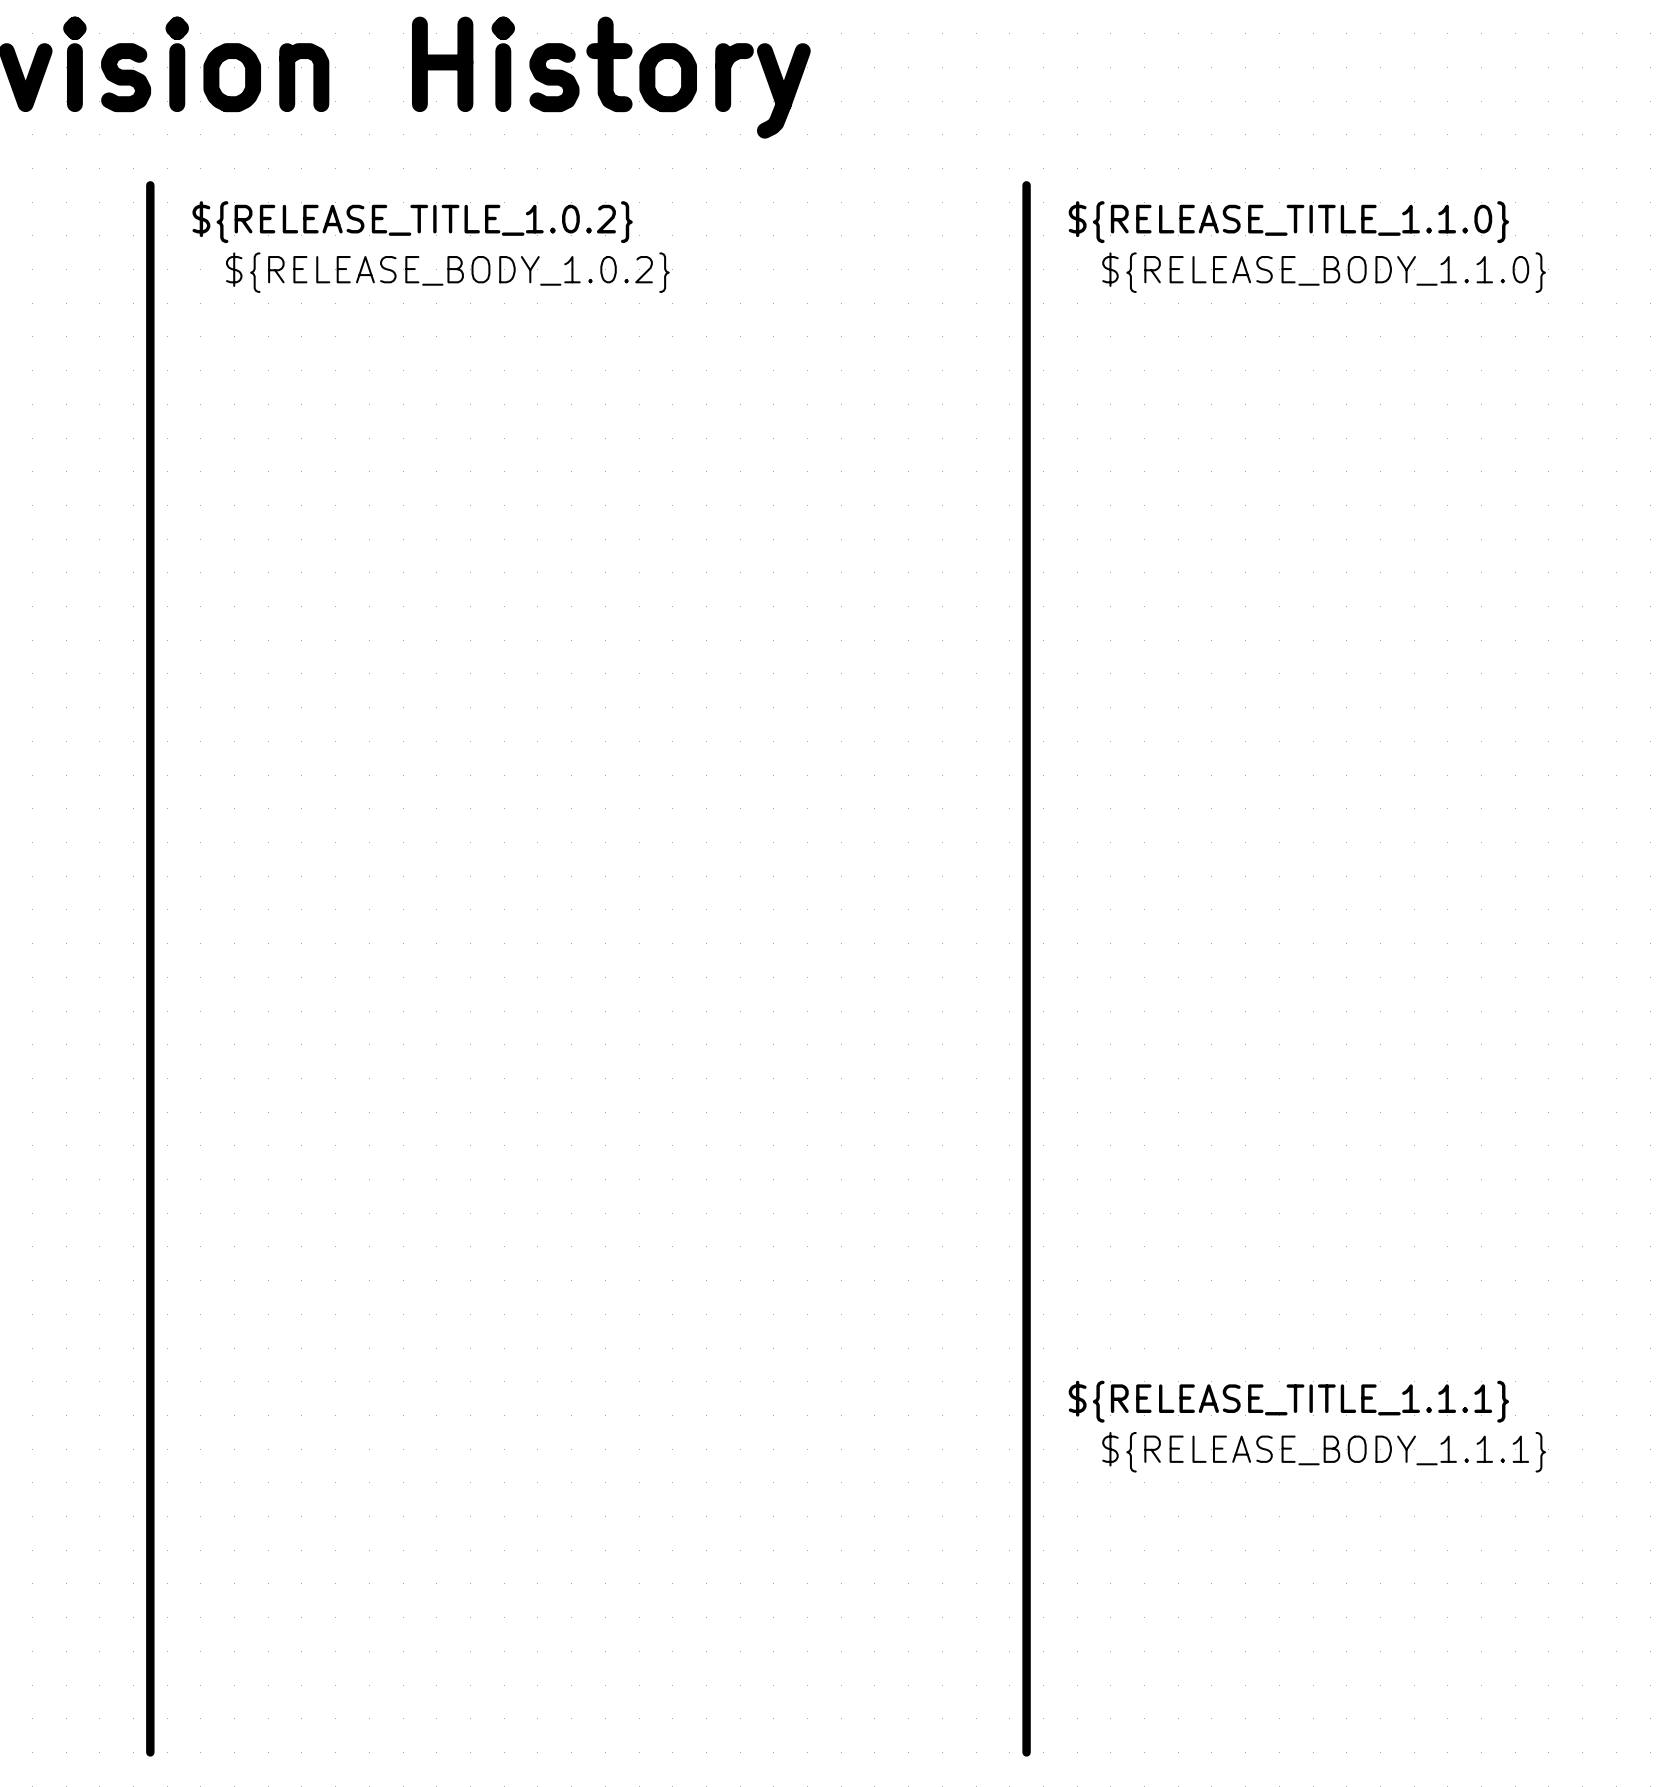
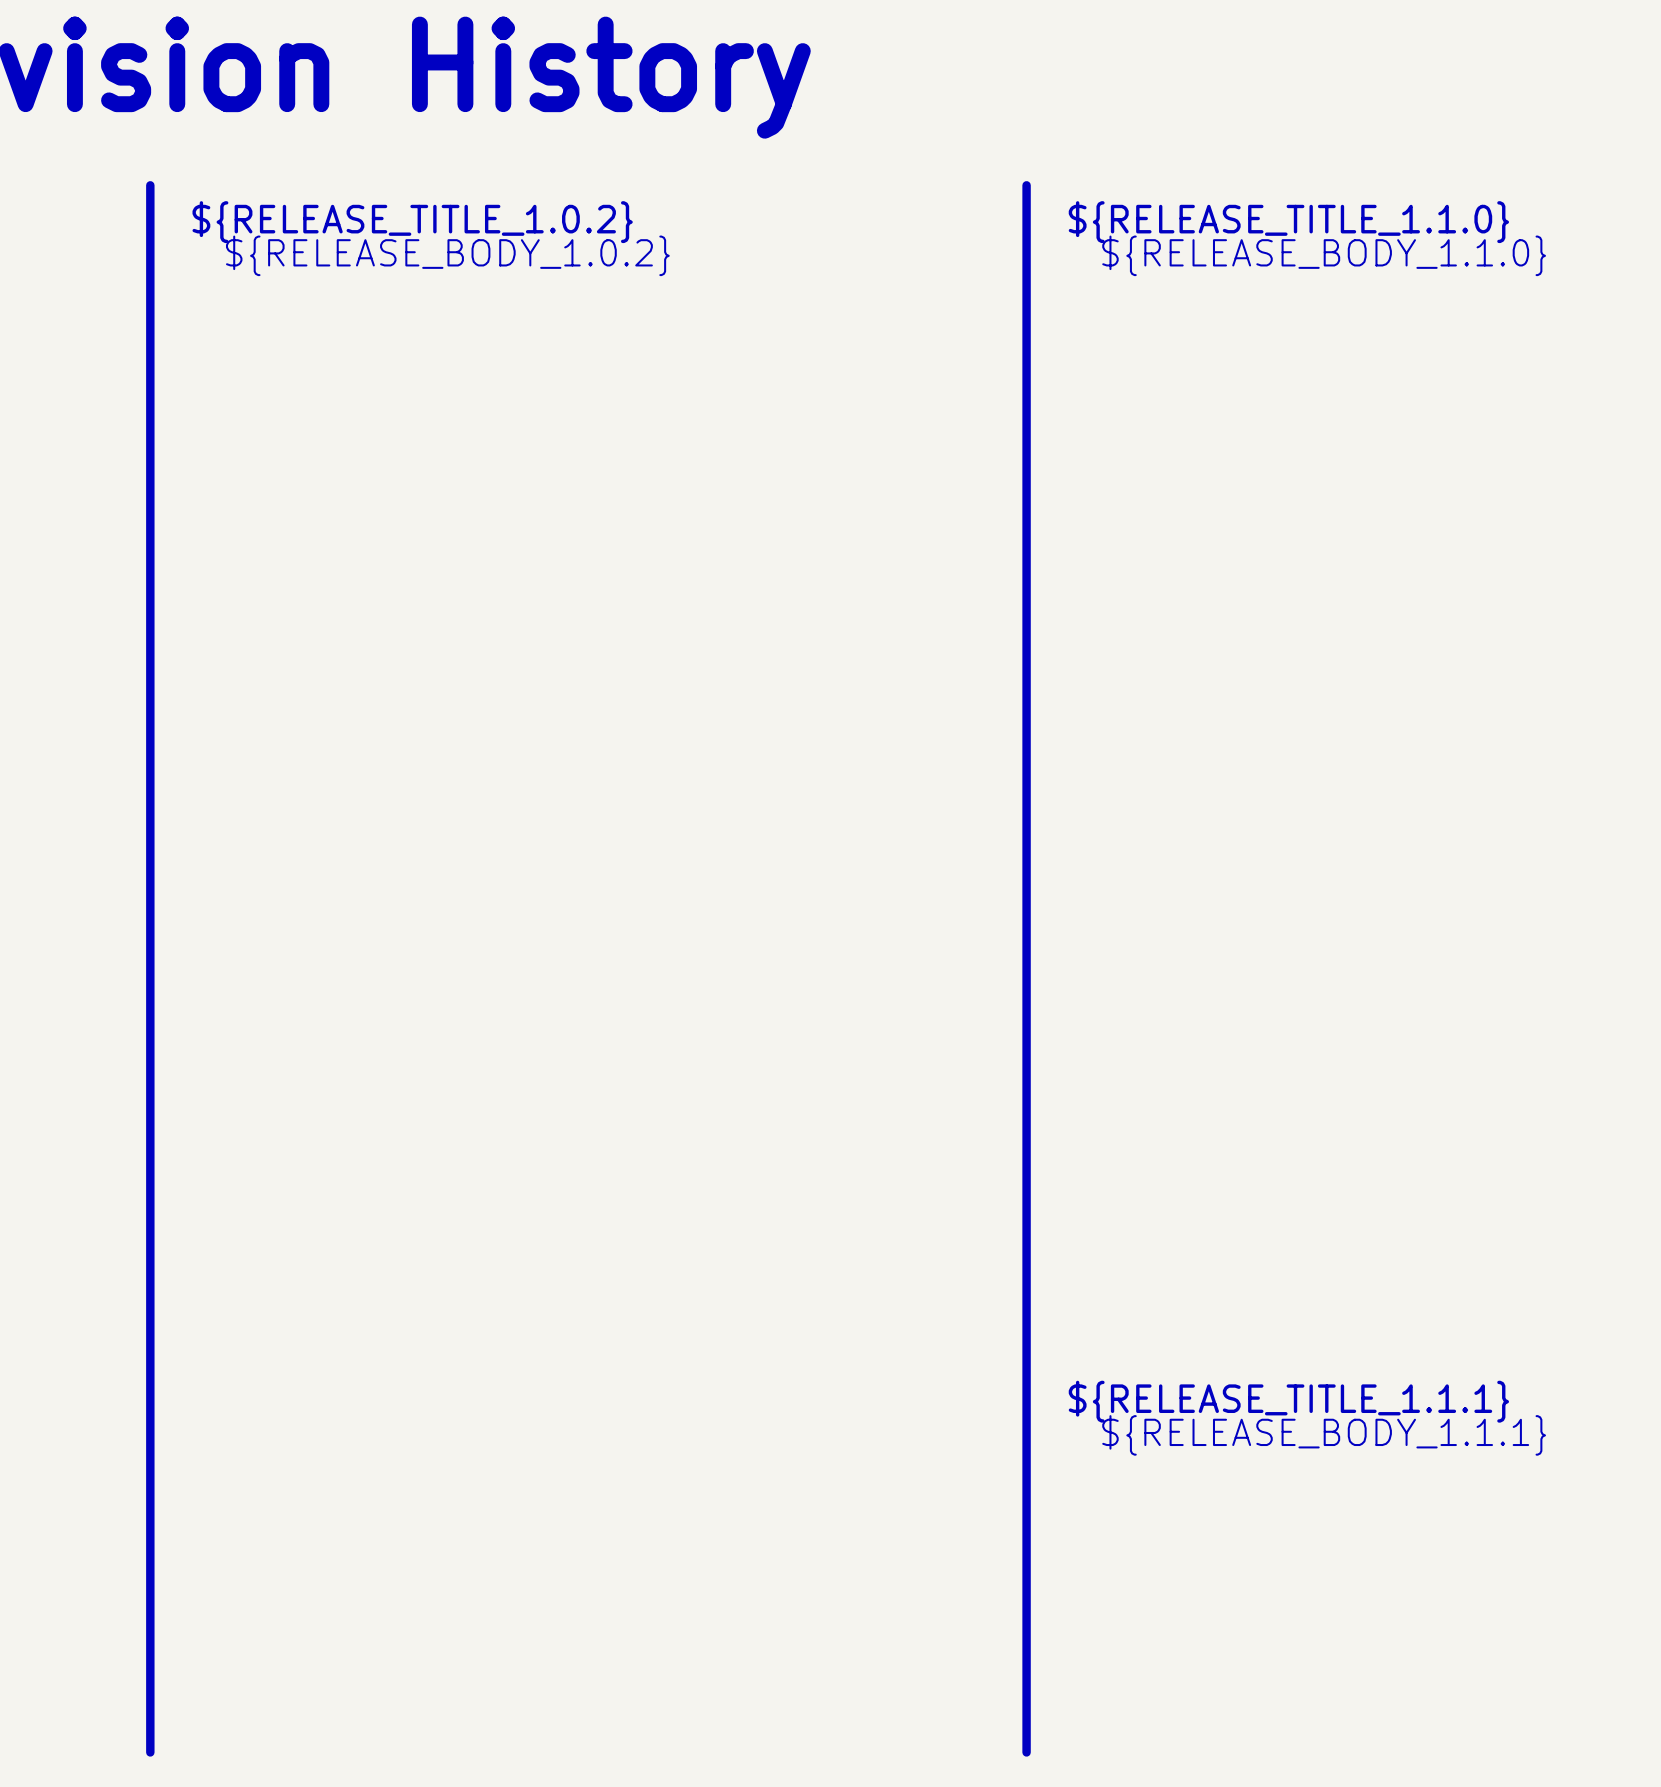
text position: ${RELEASE_BODY_1.0.2} (447, 272) -> ${RELEASE_BODY_1.0.2} (447, 255)
text position: ${RELEASE_BODY_1.1.0} (1324, 272) -> ${RELEASE_BODY_1.1.0} (1324, 255)
text position: ${RELEASE_BODY_1.1.1} (1324, 1452) -> ${RELEASE_BODY_1.1.1} (1324, 1435)

